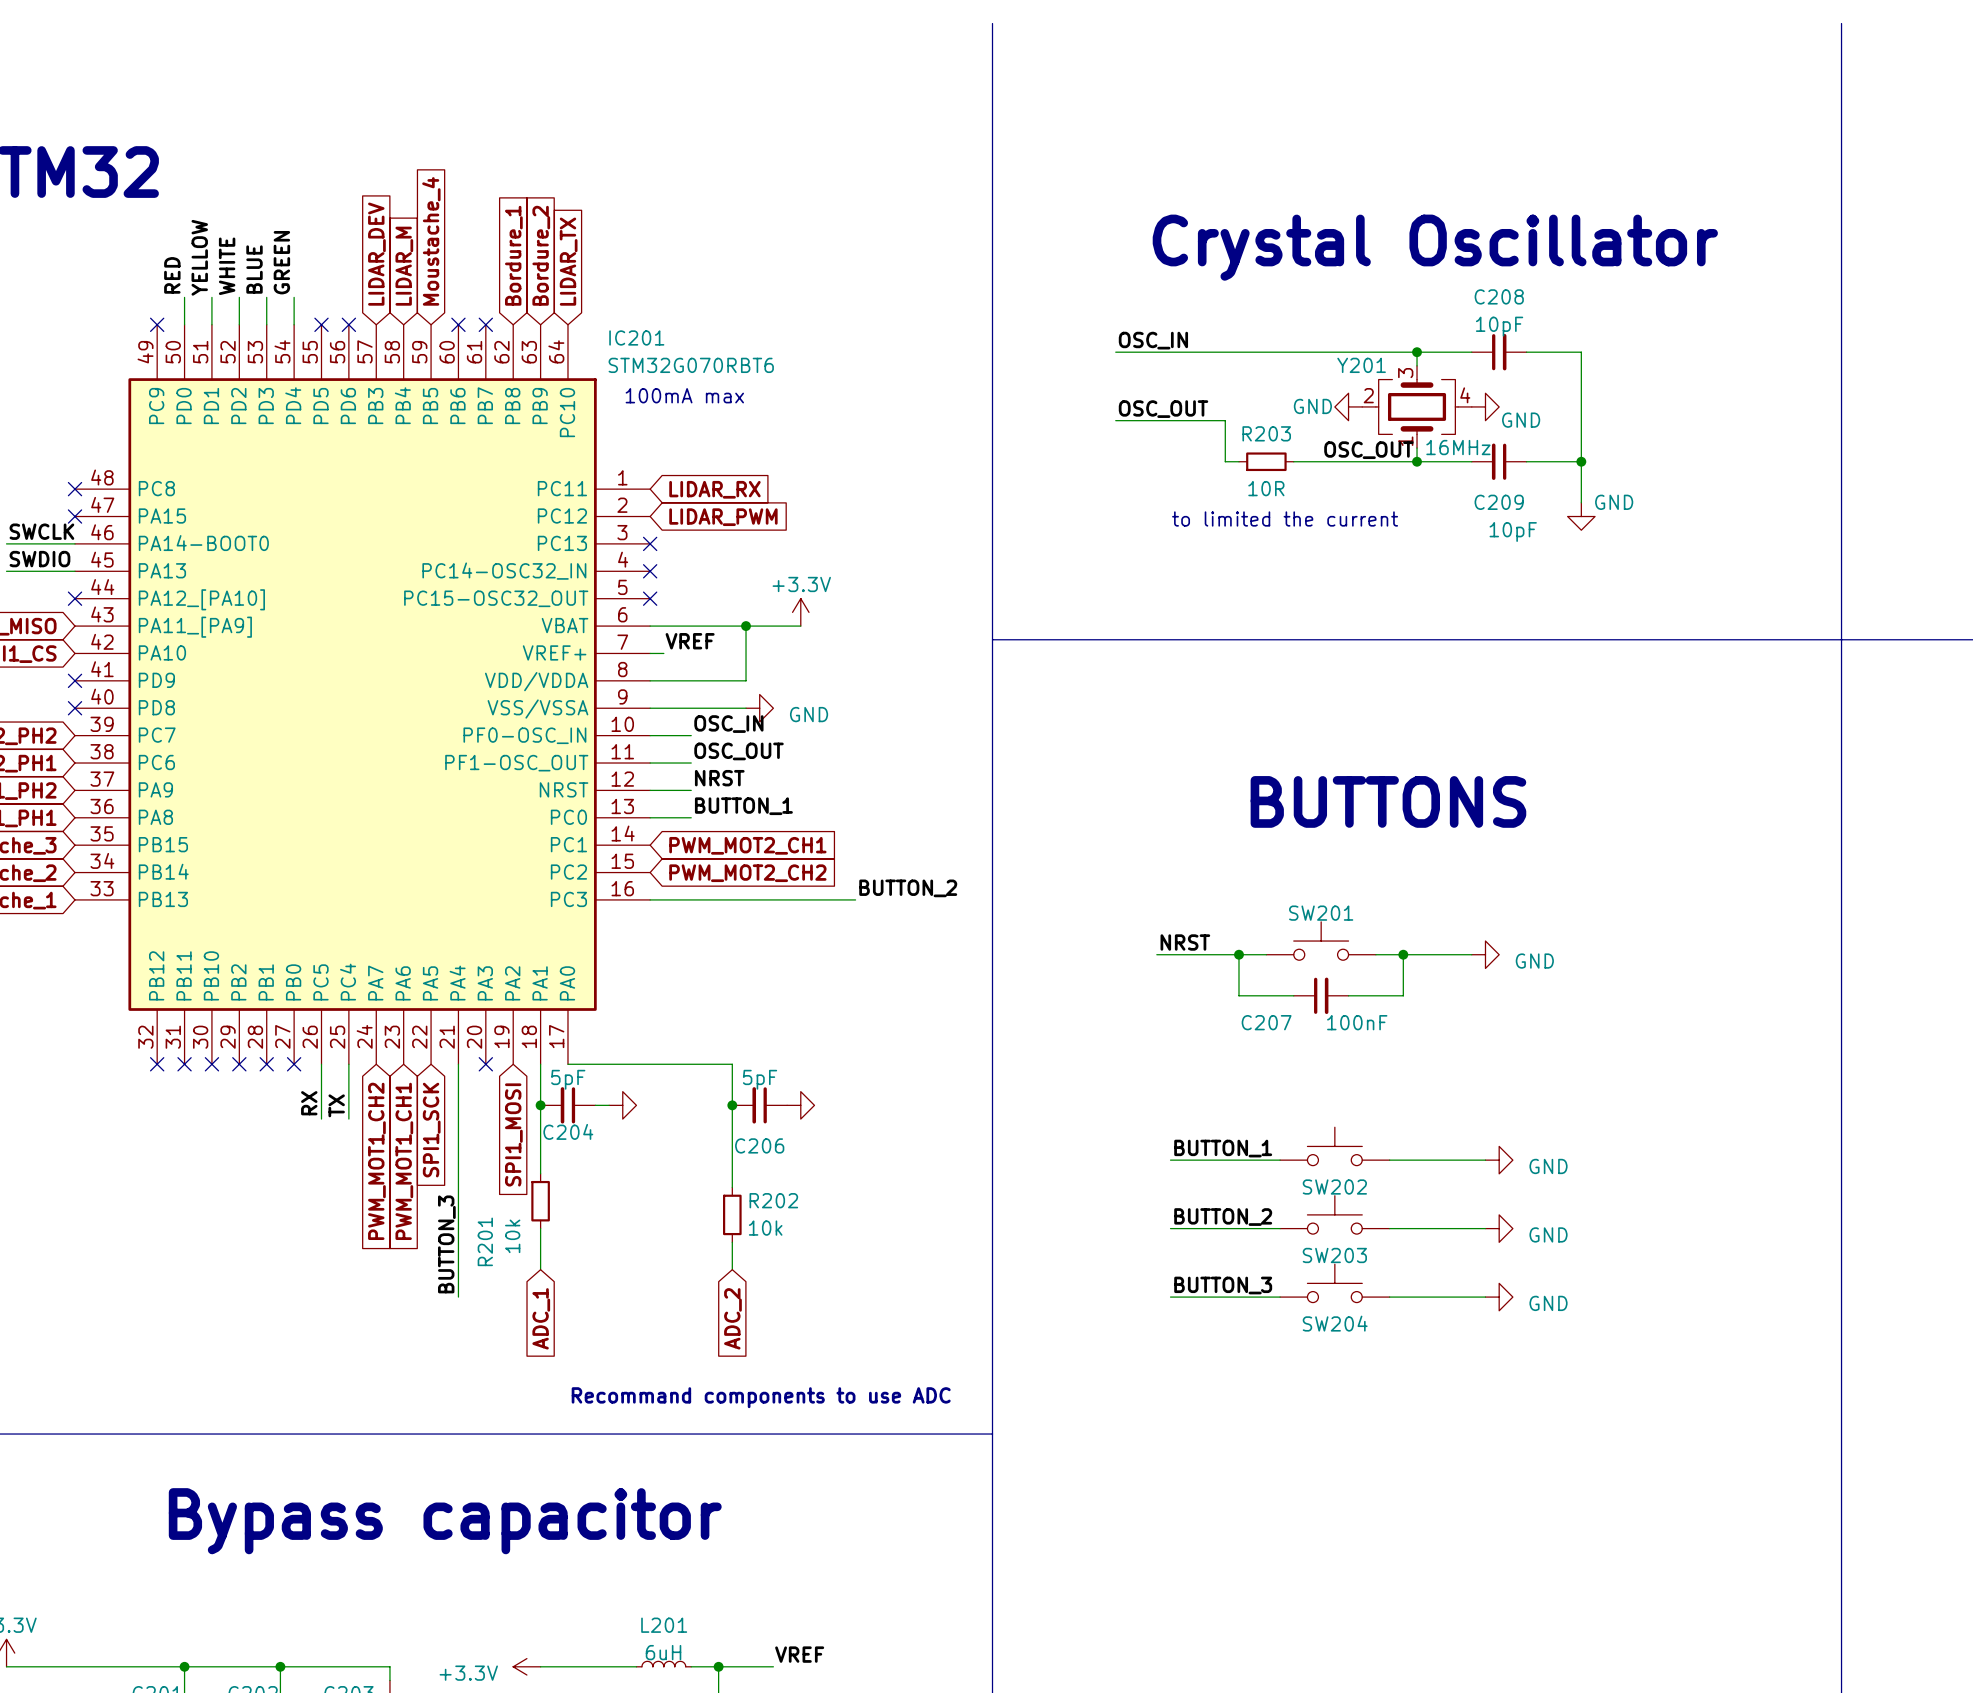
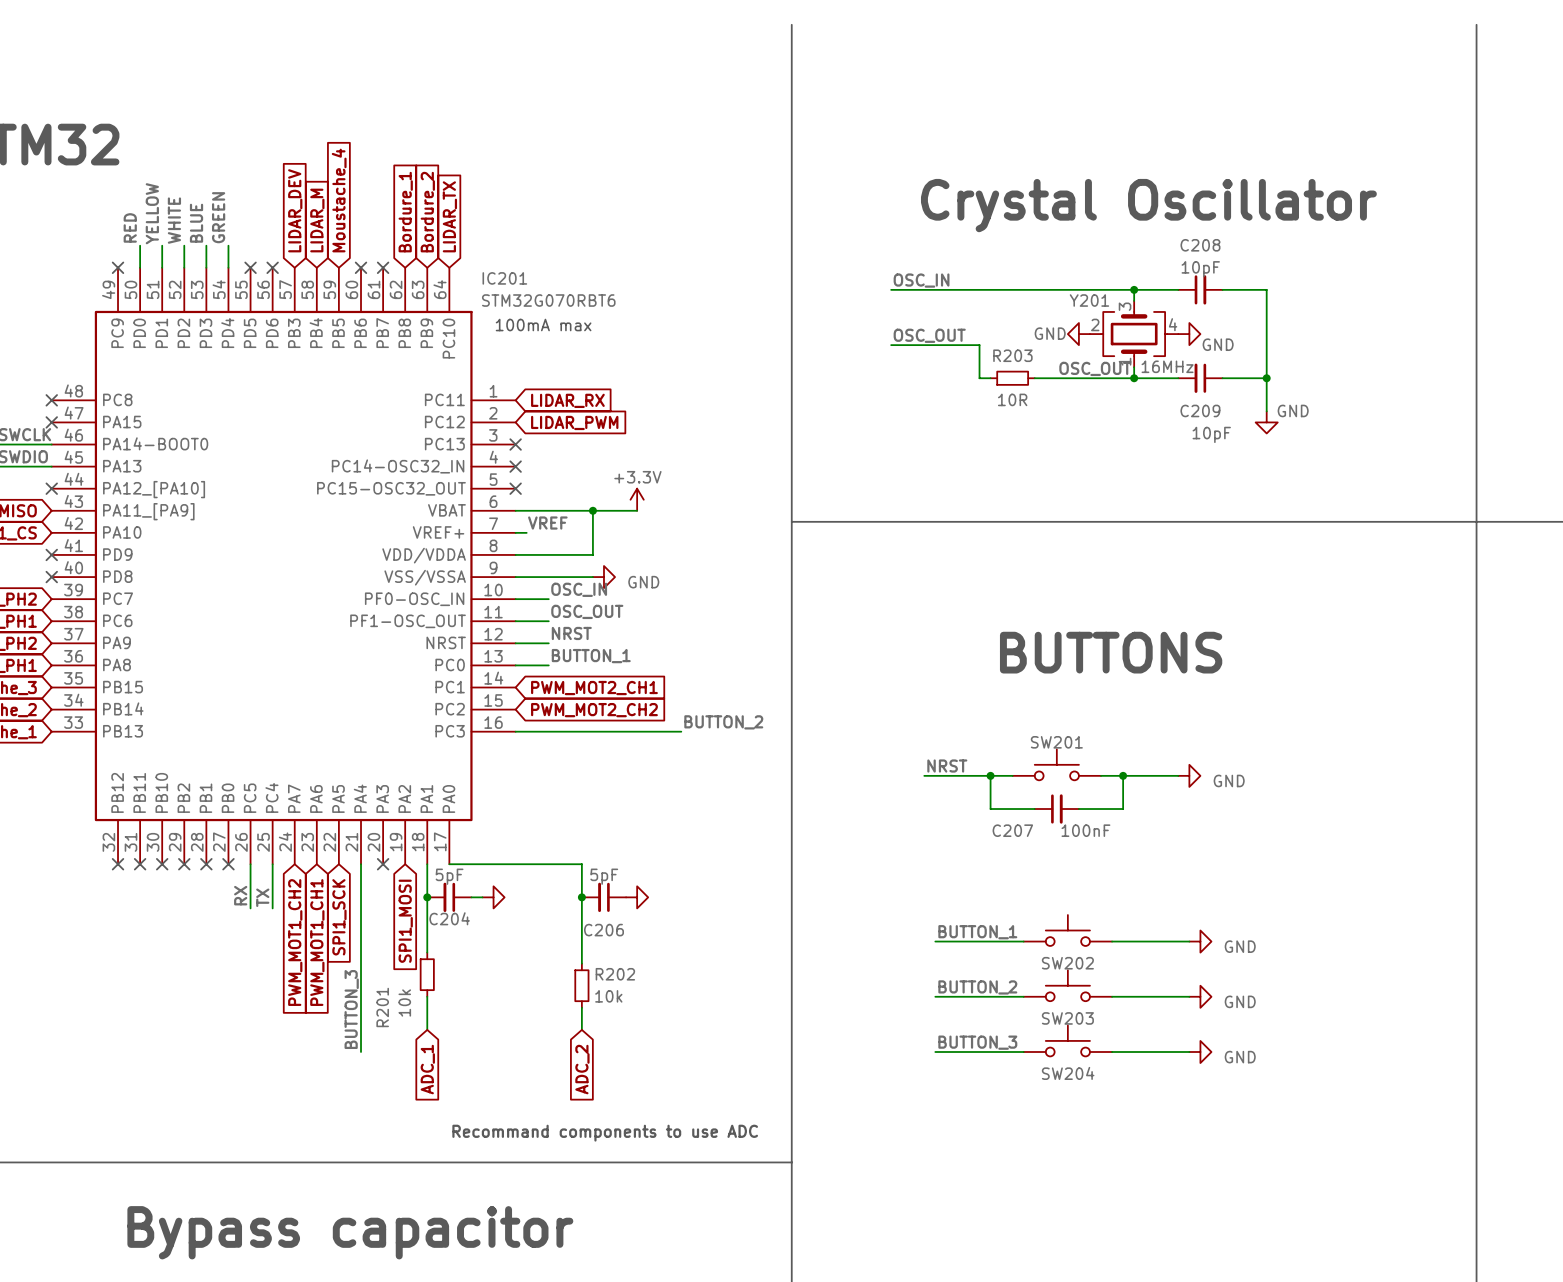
text: to limited the current (1285, 518) -> none

